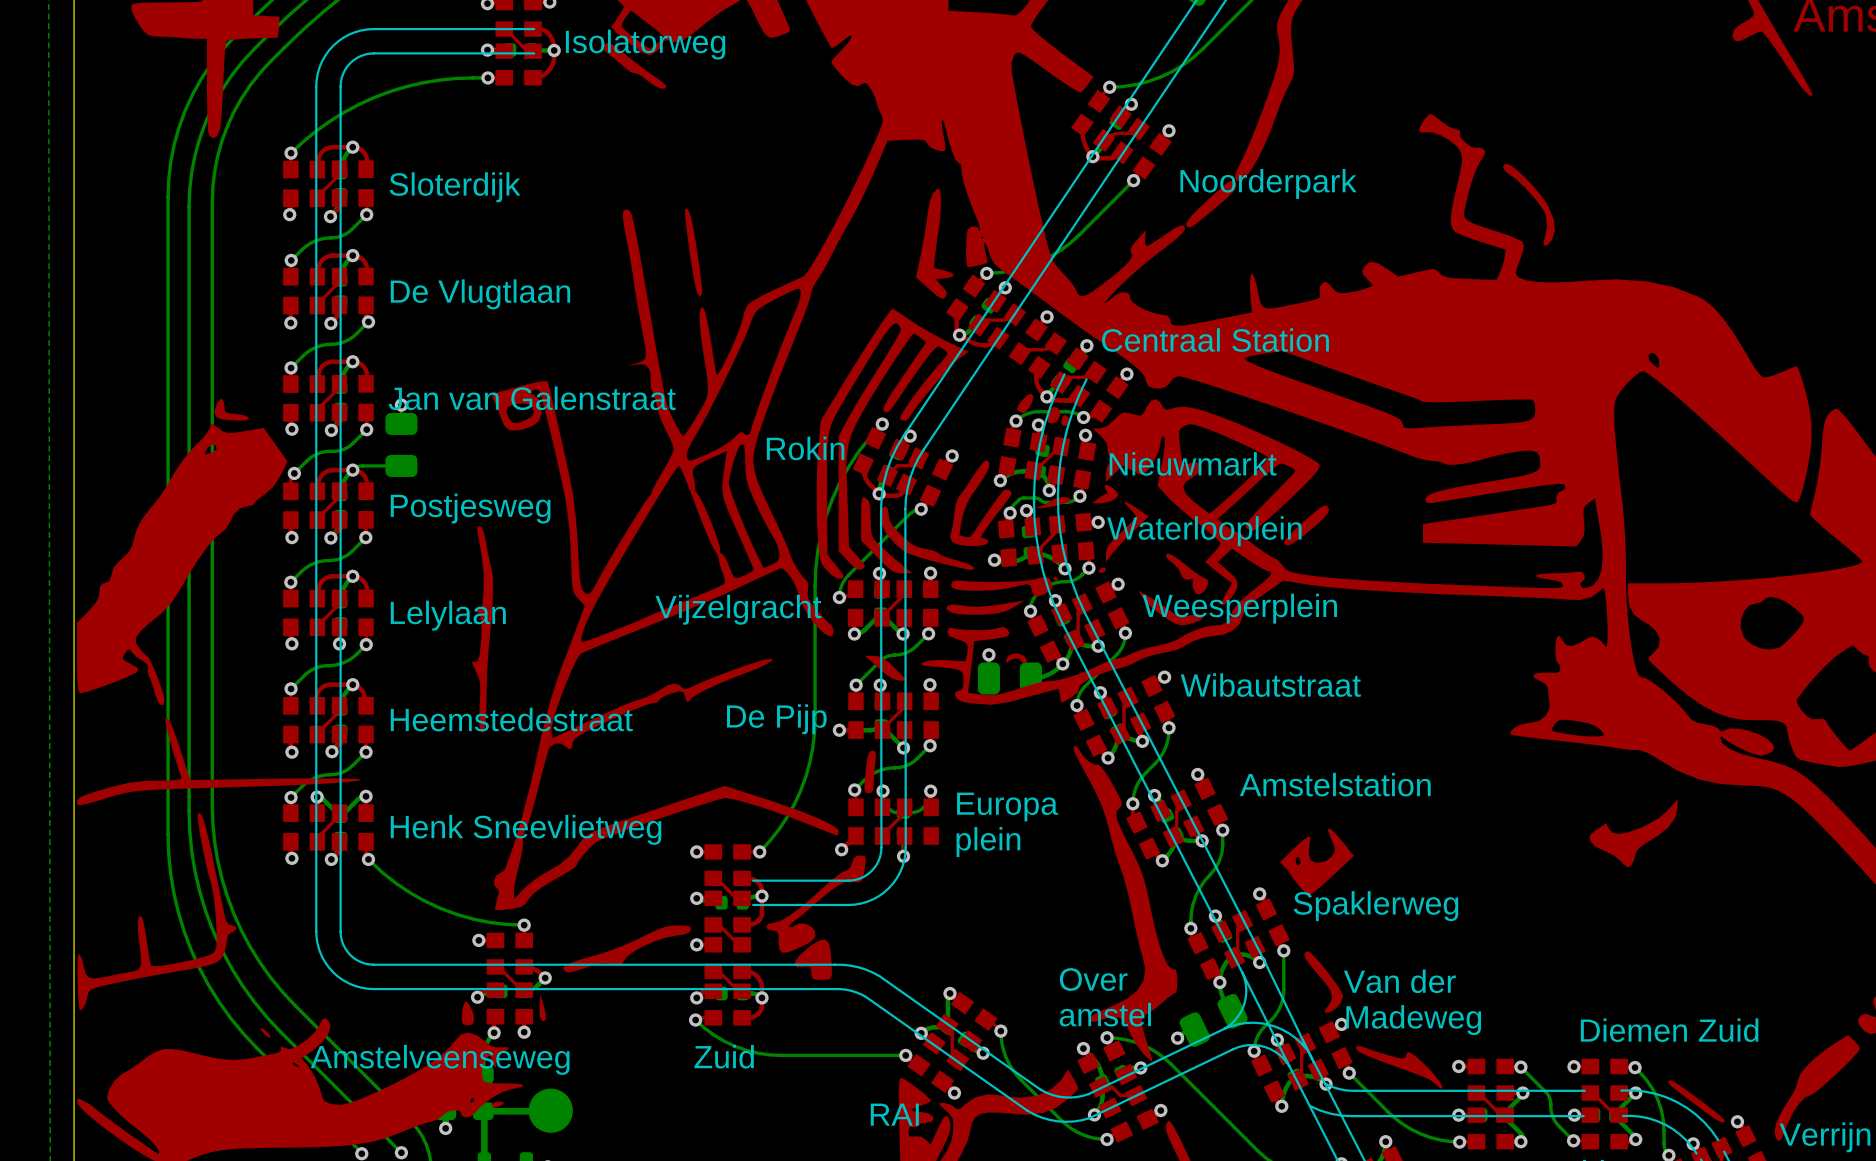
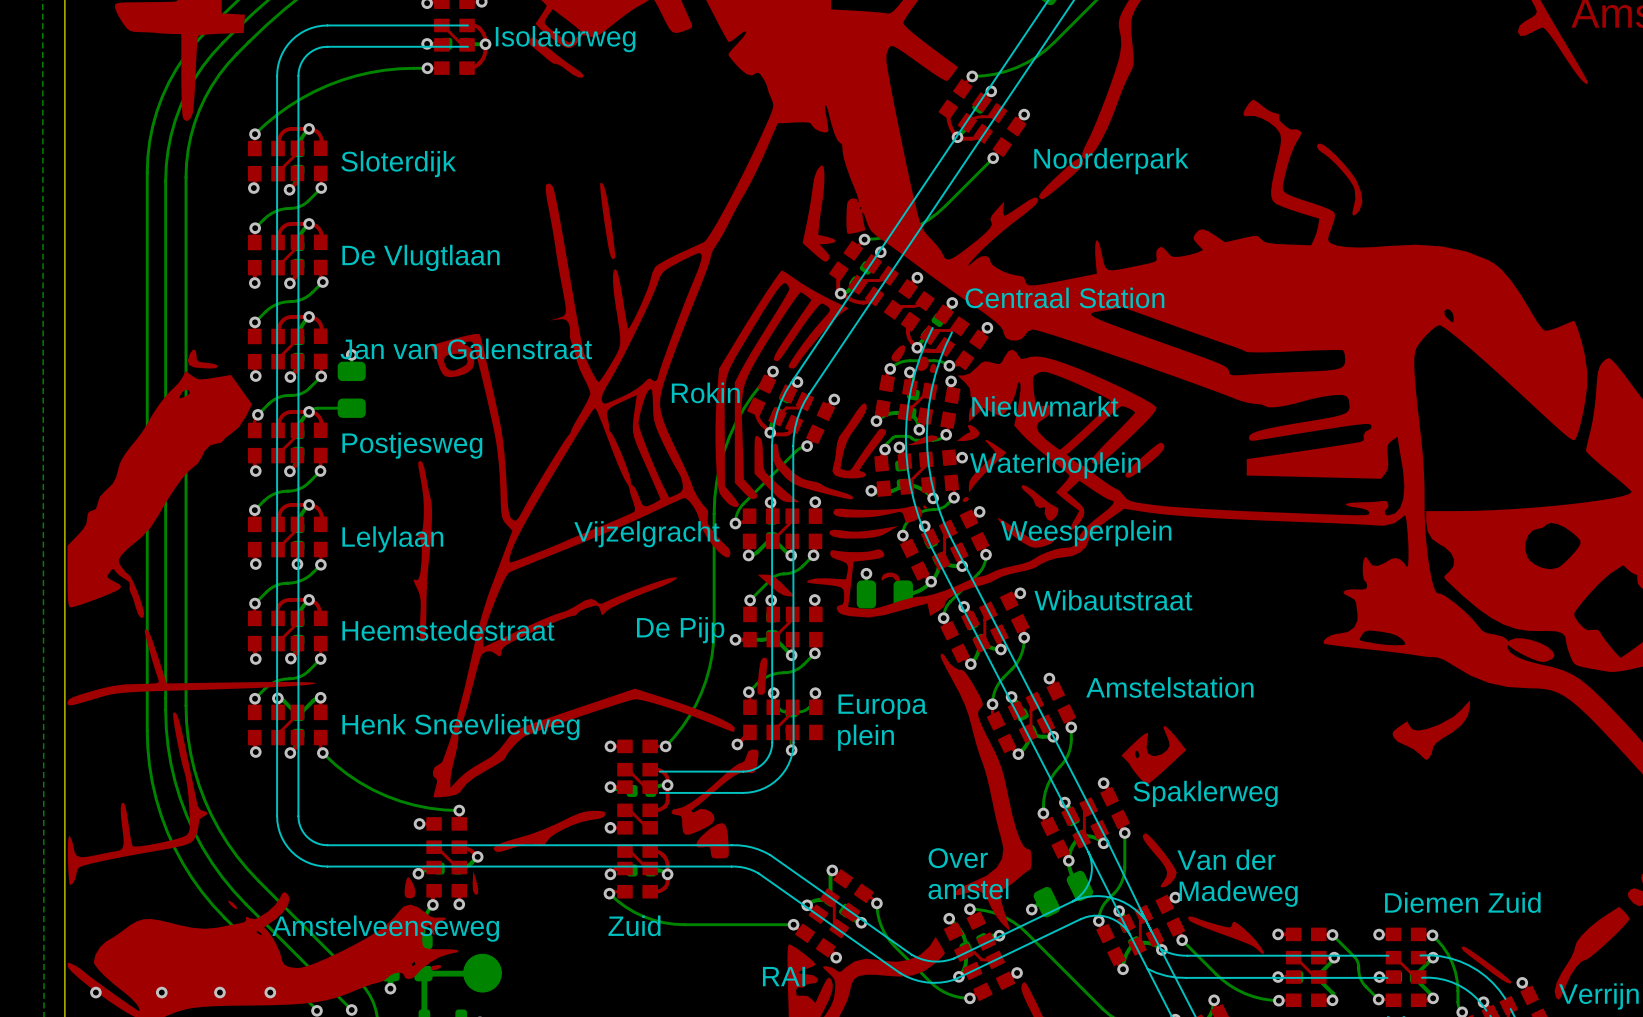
via: none -> (95, 992)
via: none -> (161, 992)
via: none -> (219, 992)
via: none -> (270, 992)

